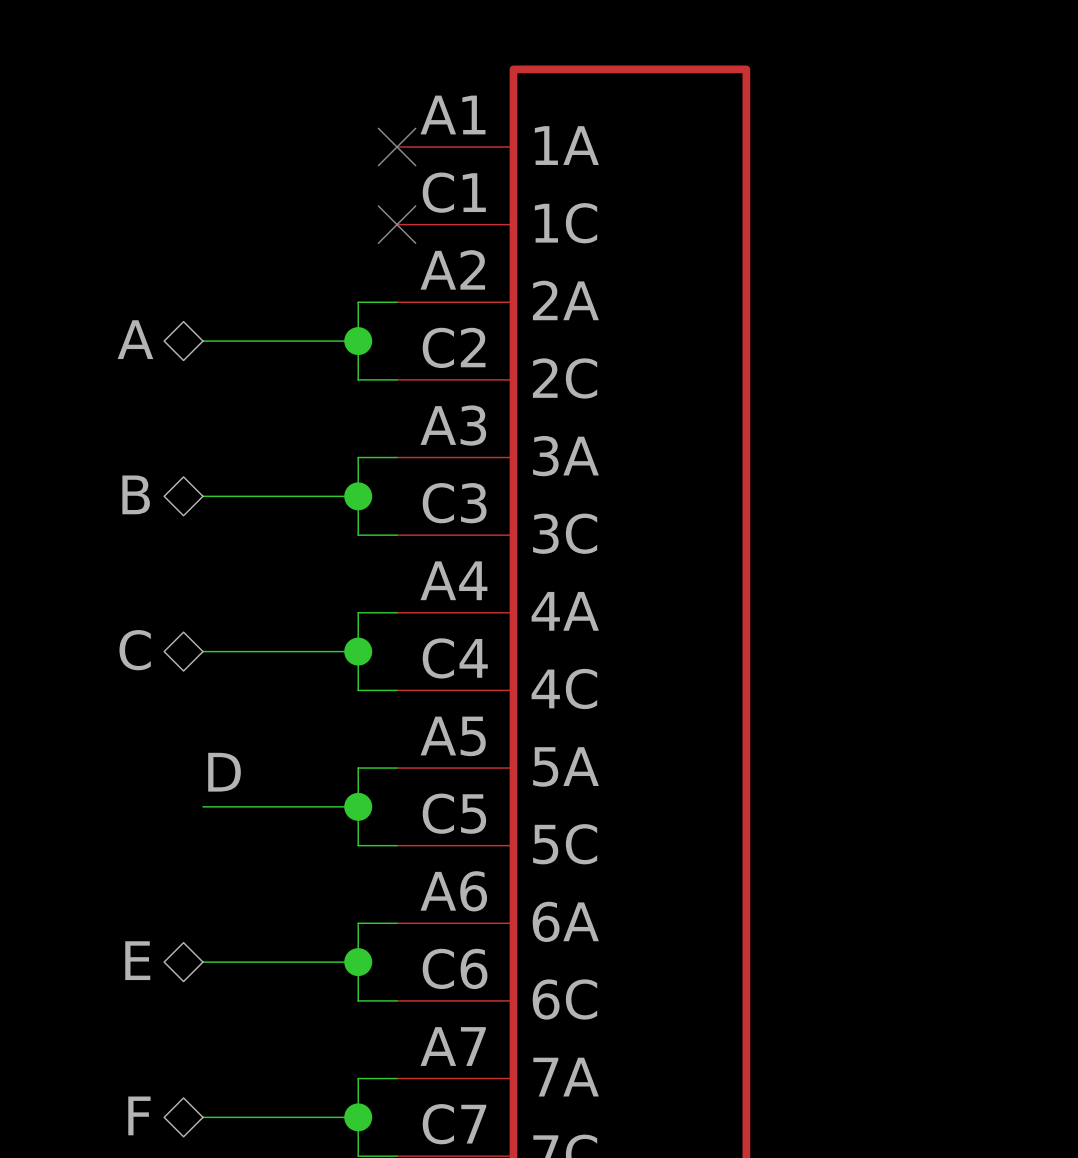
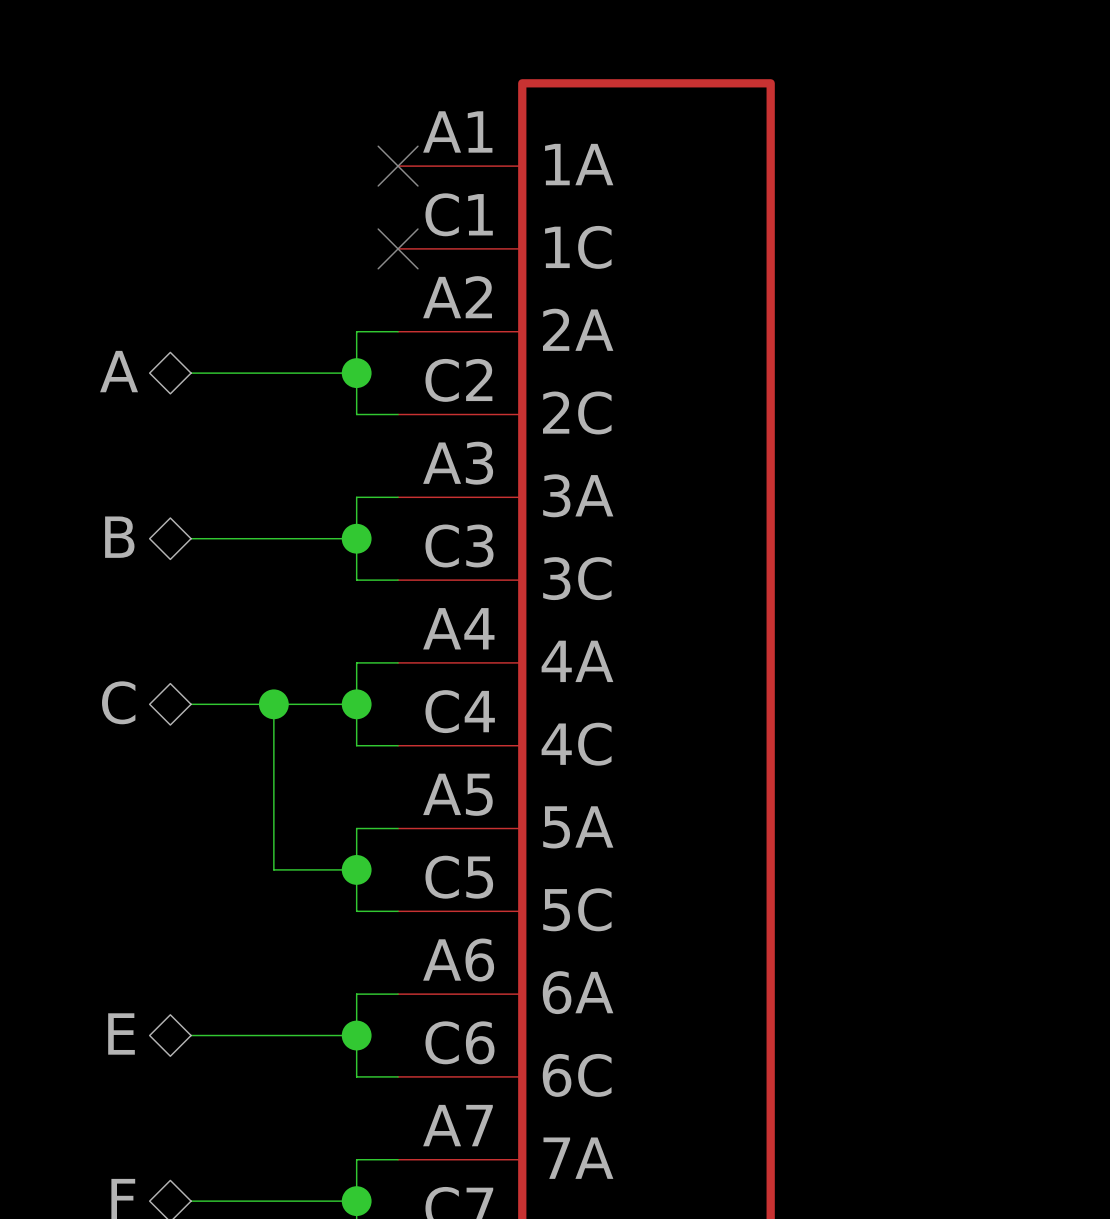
junction: none -> (273, 704)
label: D (224, 772) -> none
wire: (202, 806) (280, 806) -> (273, 704) (273, 869)

